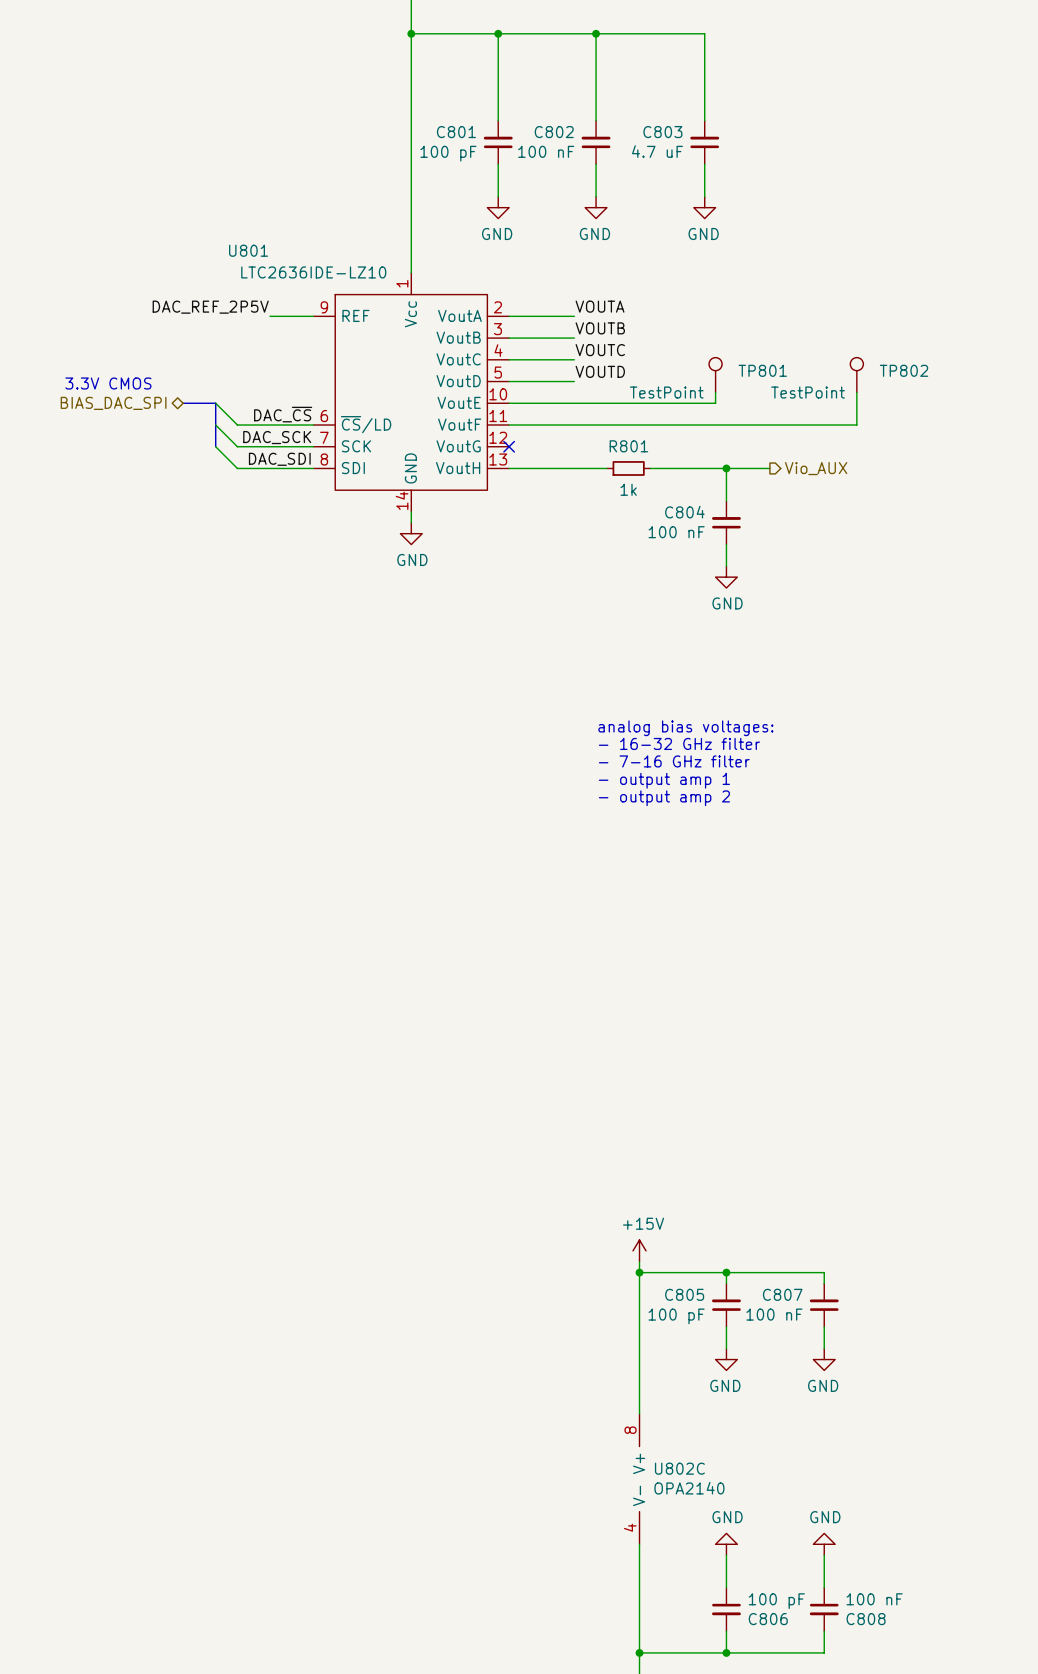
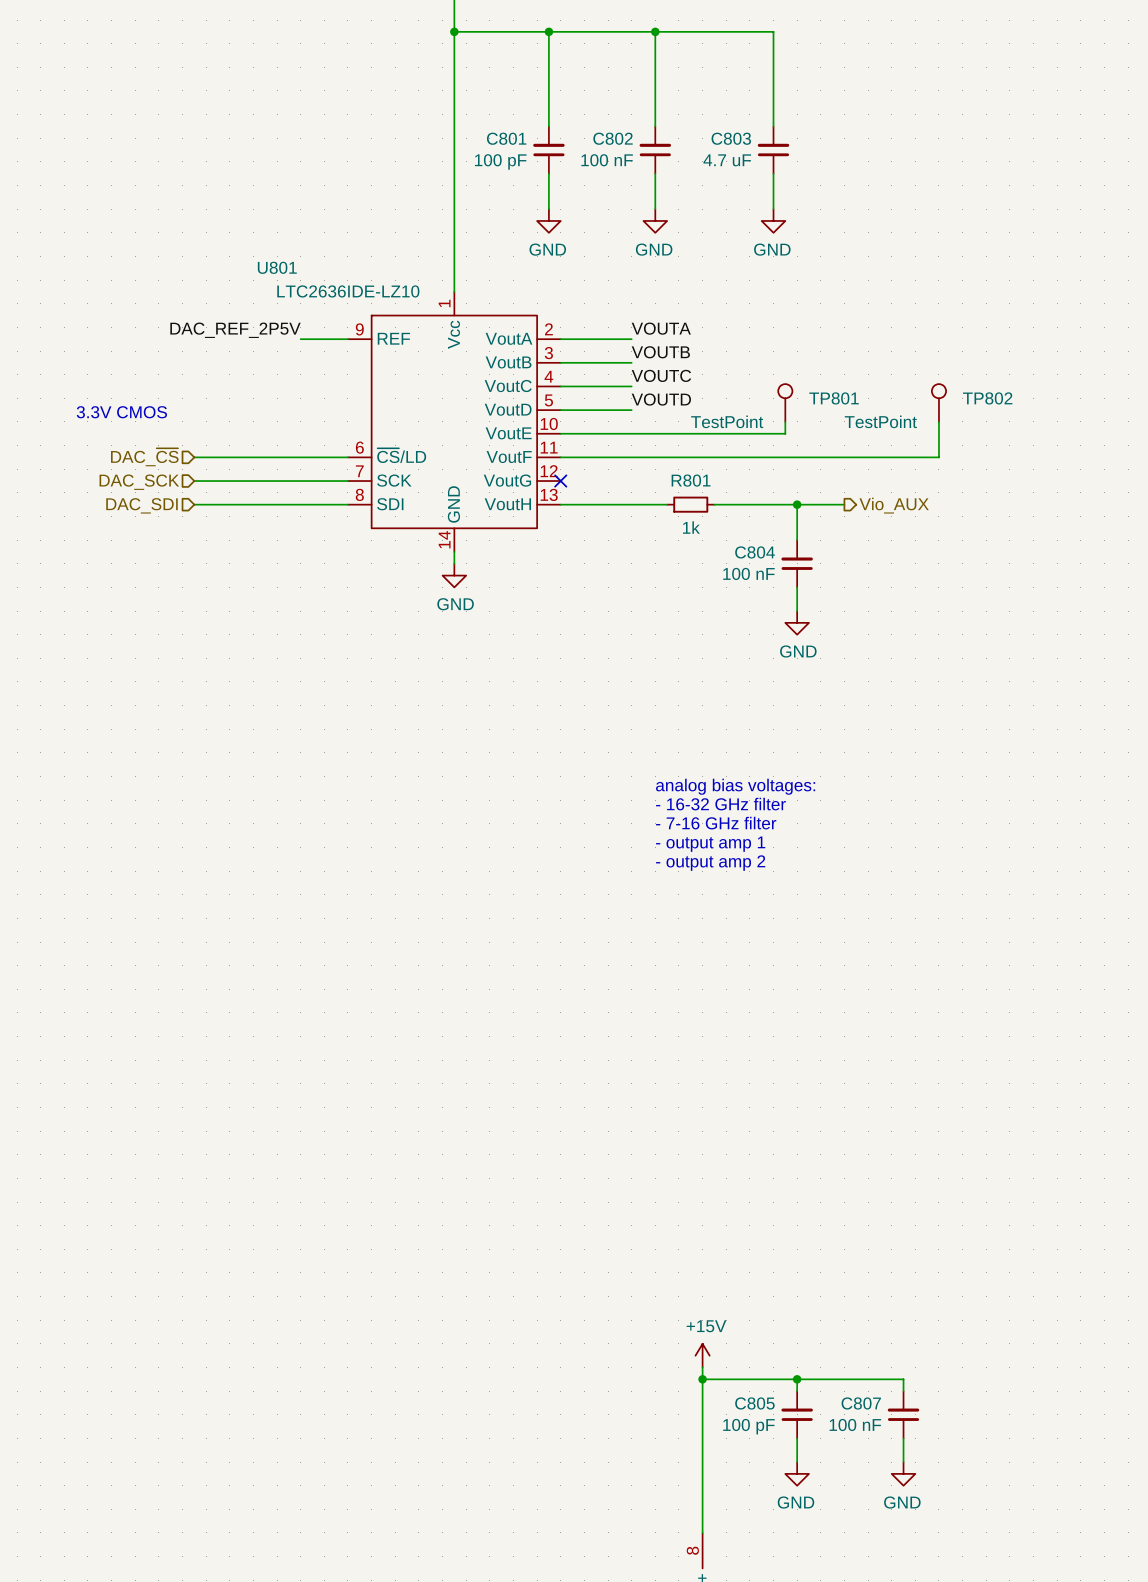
hierarchical label: BIAS_DAC_SPI (113, 403) -> none
bus: (183, 403) (215, 403) (215, 446) -> none
wire: (215, 403) (237, 425) -> (194, 457) (265, 457)
label: DAC_~{CS} (283, 414) -> none
hierarchical label: none -> DAC_~{CS} (144, 457)
wire: (215, 425) (237, 446) -> (194, 481) (265, 481)
label: DAC_SCK (277, 437) -> none
hierarchical label: none -> DAC_SCK (139, 482)
wire: (215, 446) (237, 468) -> (194, 504) (265, 504)
label: DAC_SDI (279, 459) -> none
hierarchical label: none -> DAC_SDI (141, 505)

